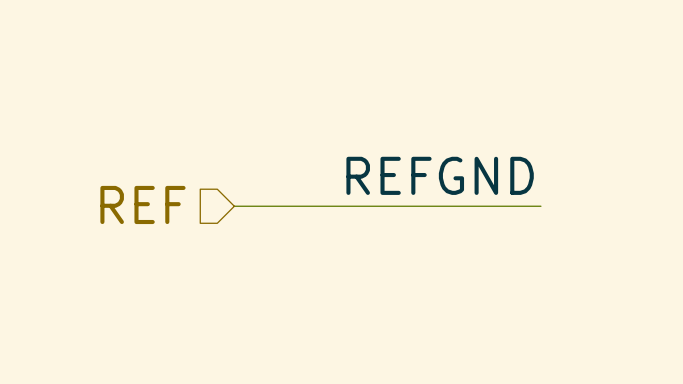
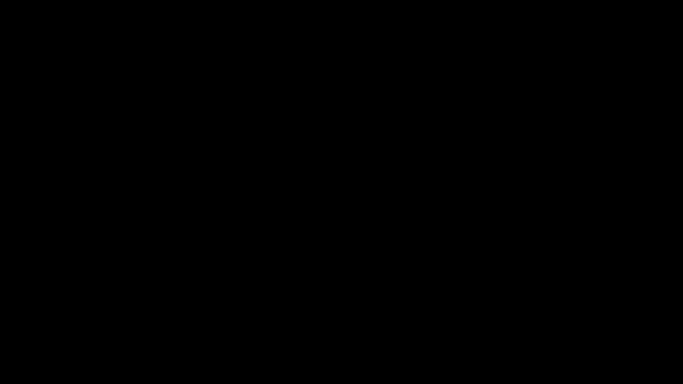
label: REFGND (440, 175) -> none
hierarchical label: REF (142, 204) -> none
wire: (234, 206) (540, 206) -> none

